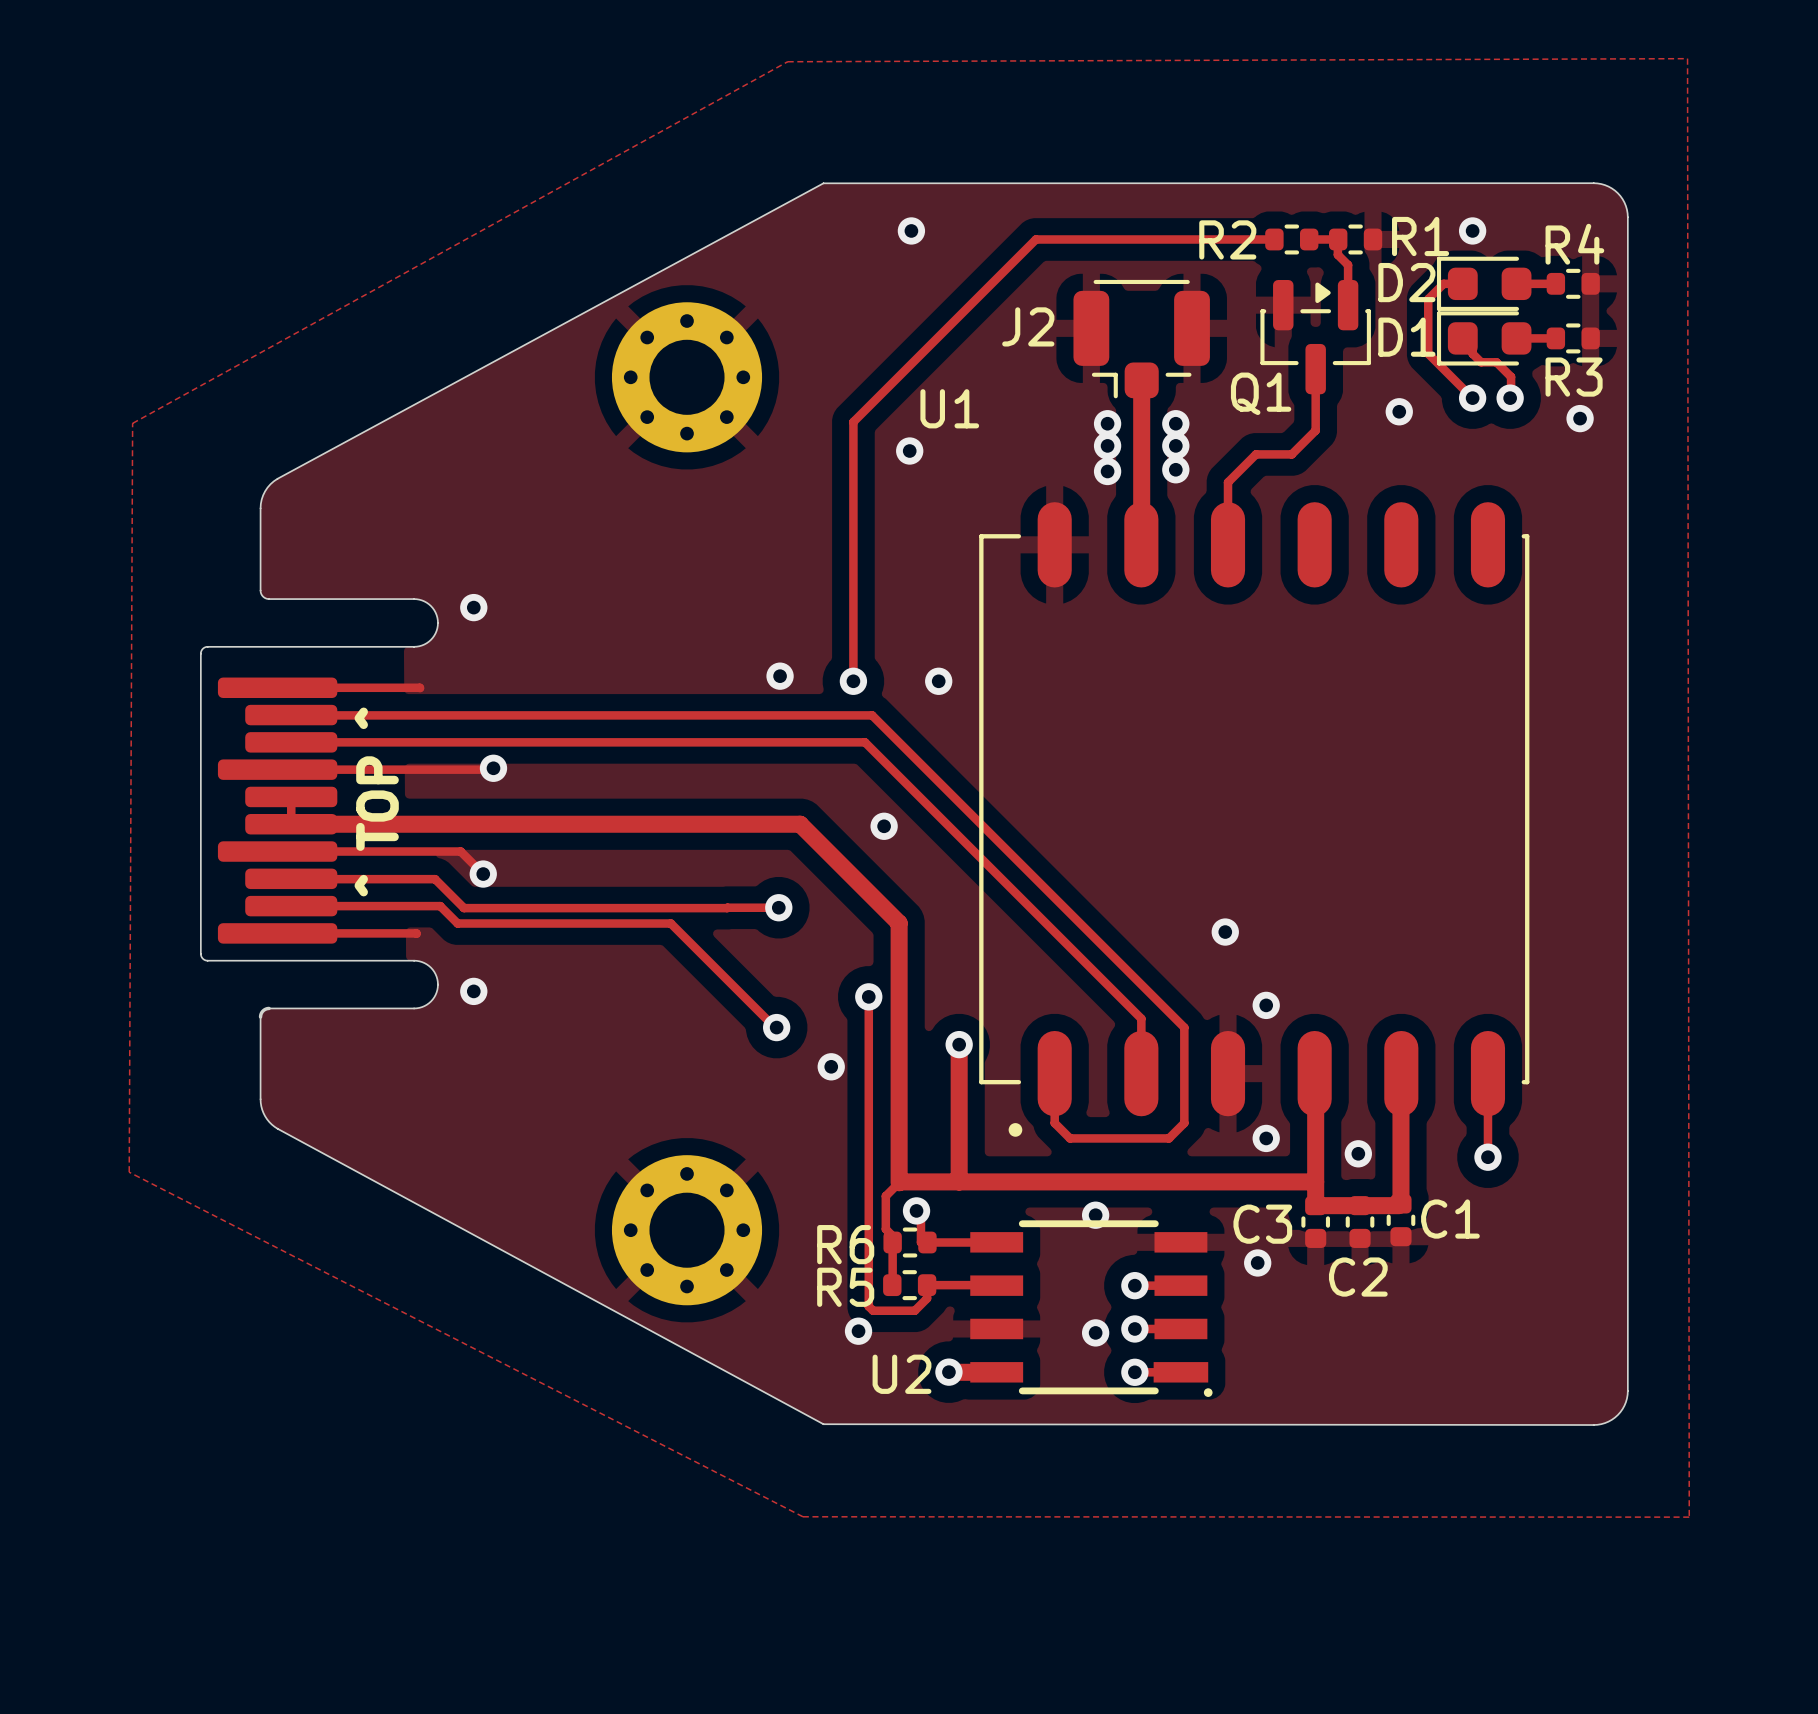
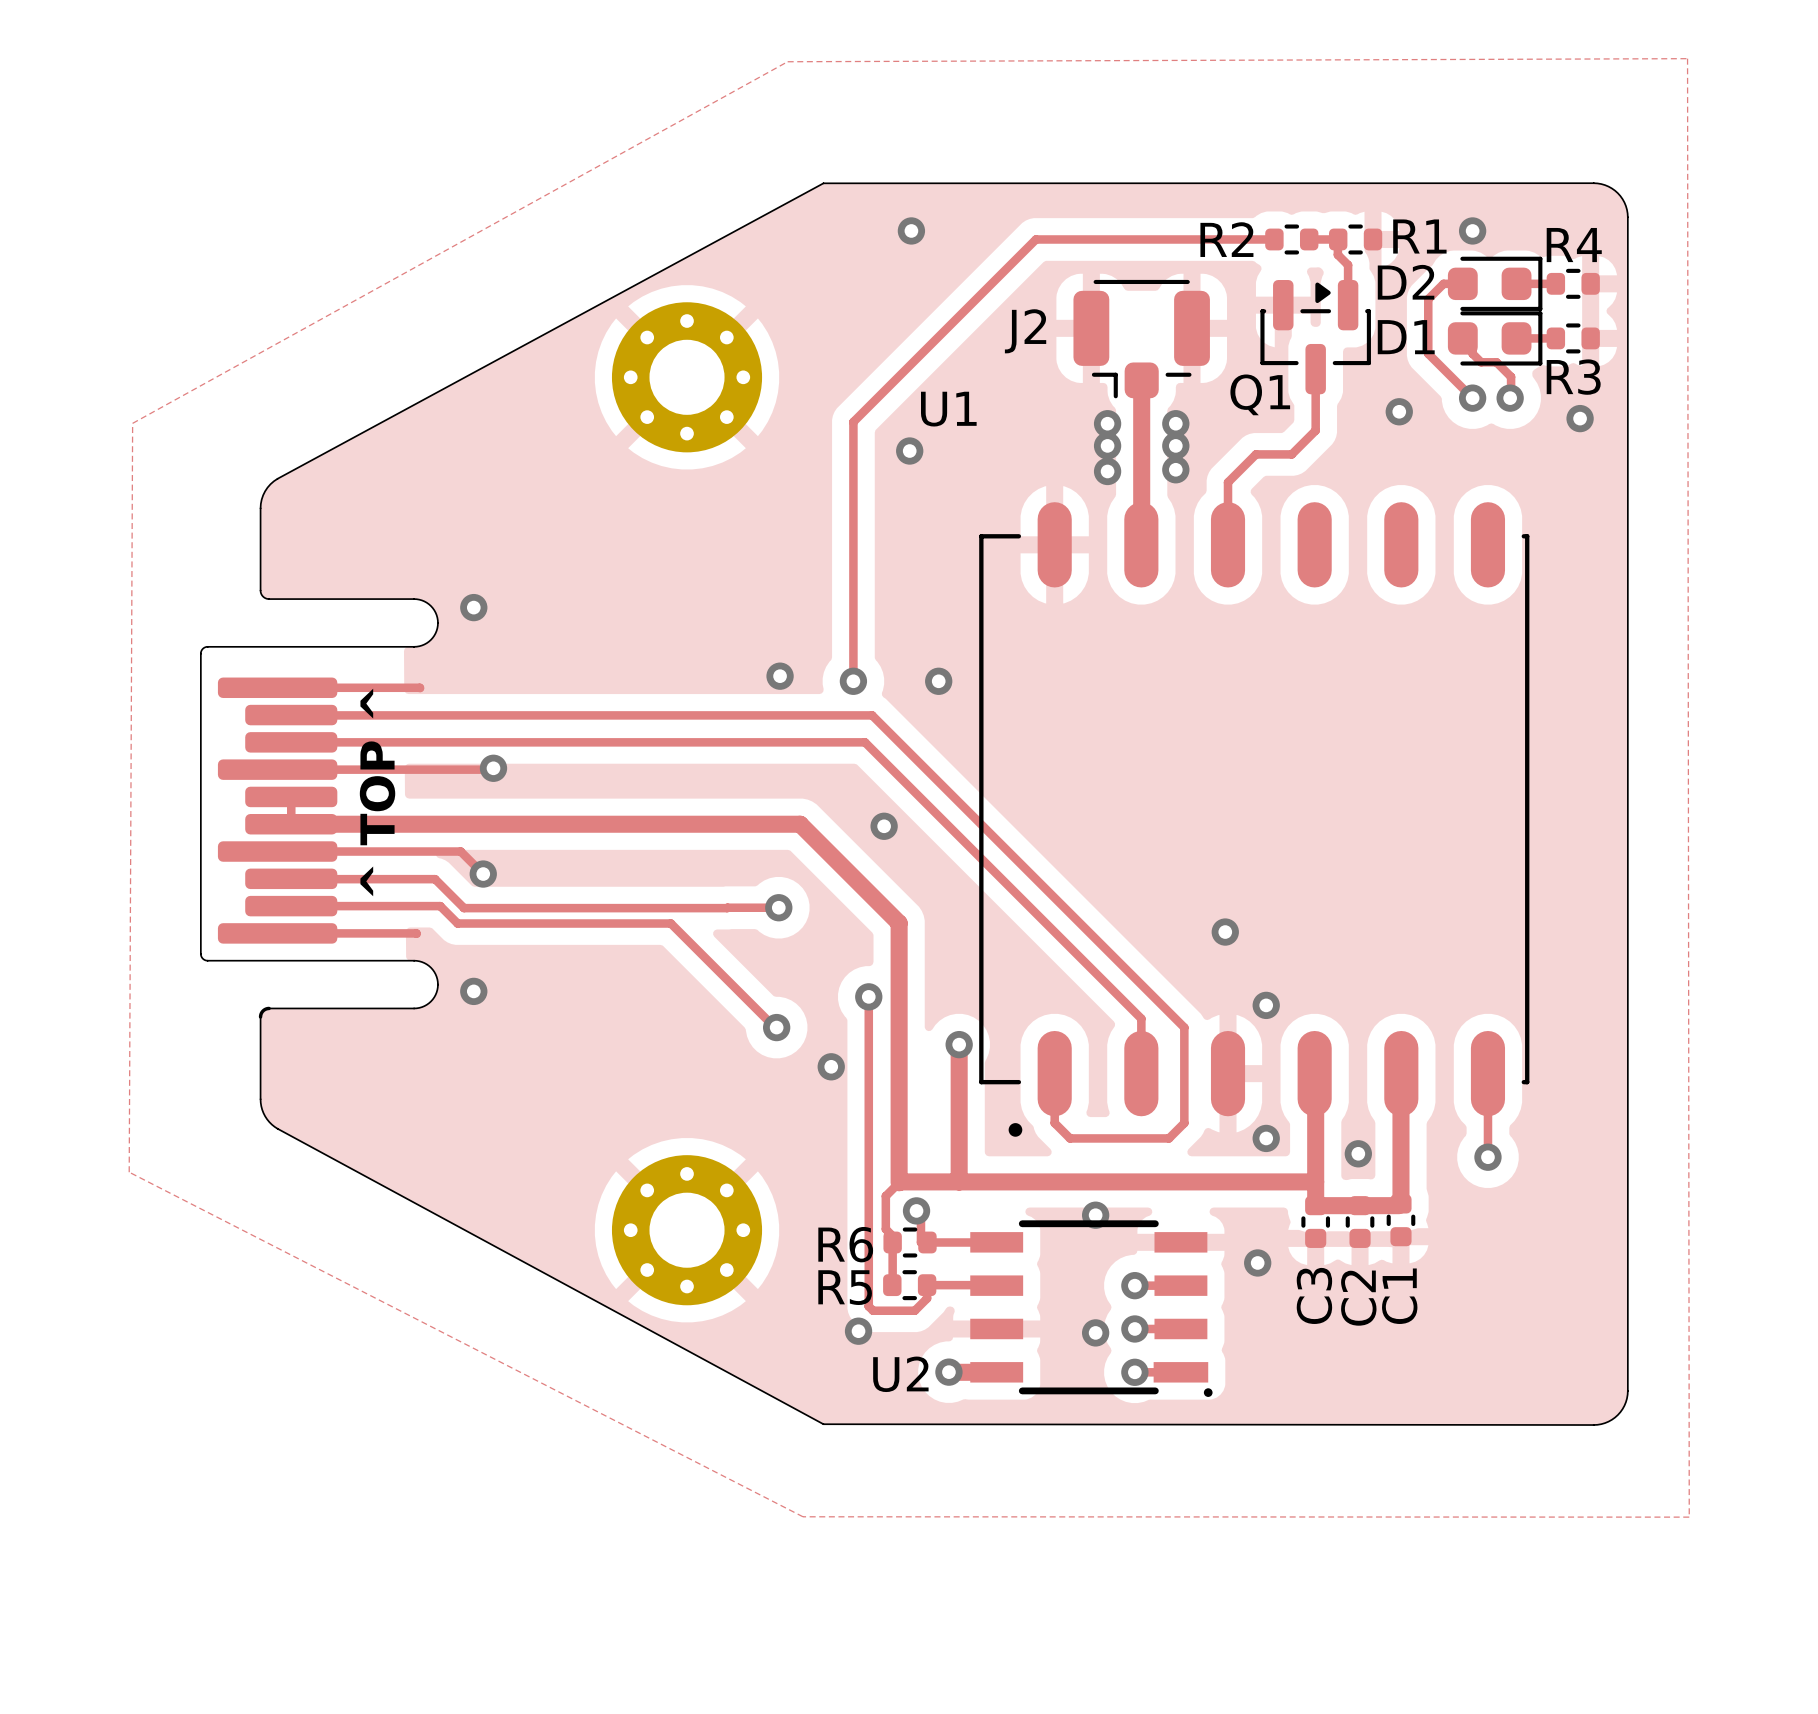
D2 rotation: 0° (1484, 283) -> 180° (1495, 283)
D1 rotation: 0° (1484, 338) -> 180° (1495, 338)
C1 name rotation: 0° (1450, 1219) -> 90° counterclockwise (1399, 1296)
C1 name position: C1 (1450, 1219) -> C1 (1399, 1296)
C3 name rotation: 0° (1262, 1224) -> 90° counterclockwise (1314, 1295)
C3 name position: C3 (1262, 1224) -> C3 (1314, 1295)
C2 name rotation: 0° (1358, 1277) -> 90° counterclockwise (1358, 1298)

